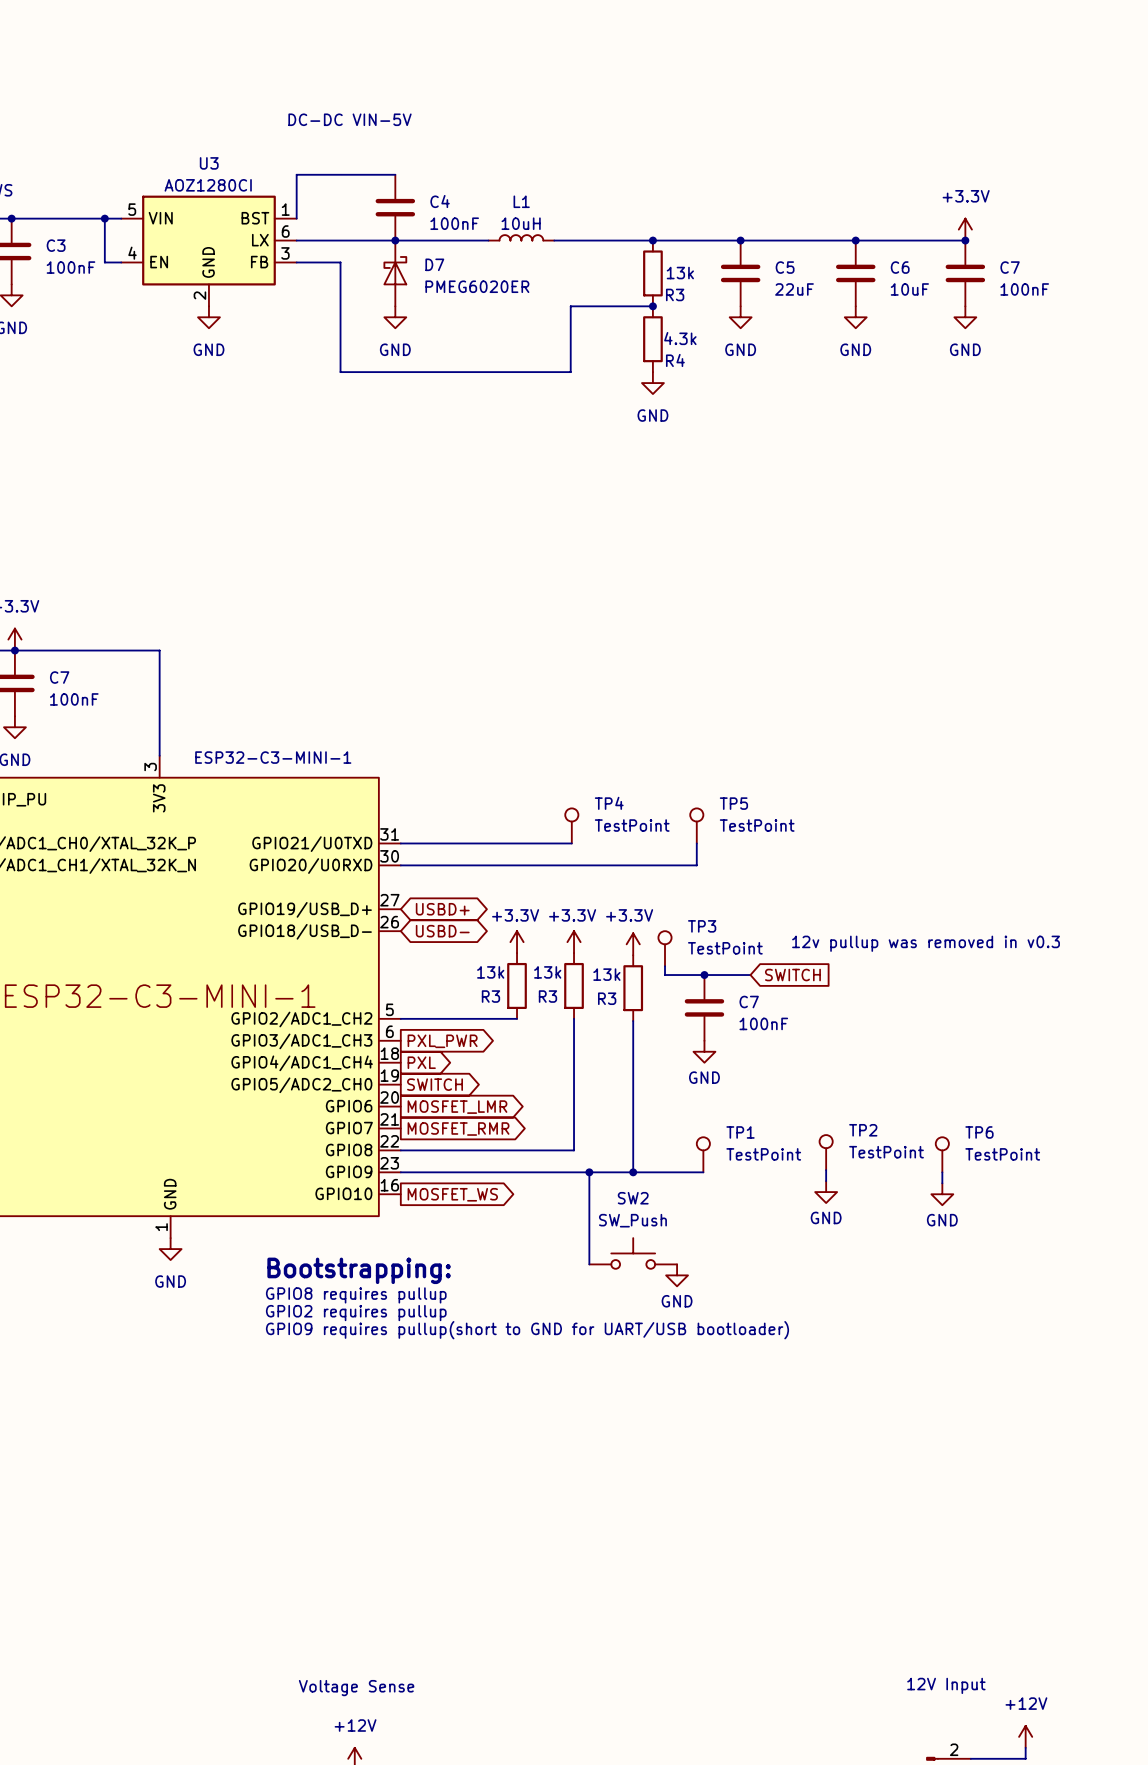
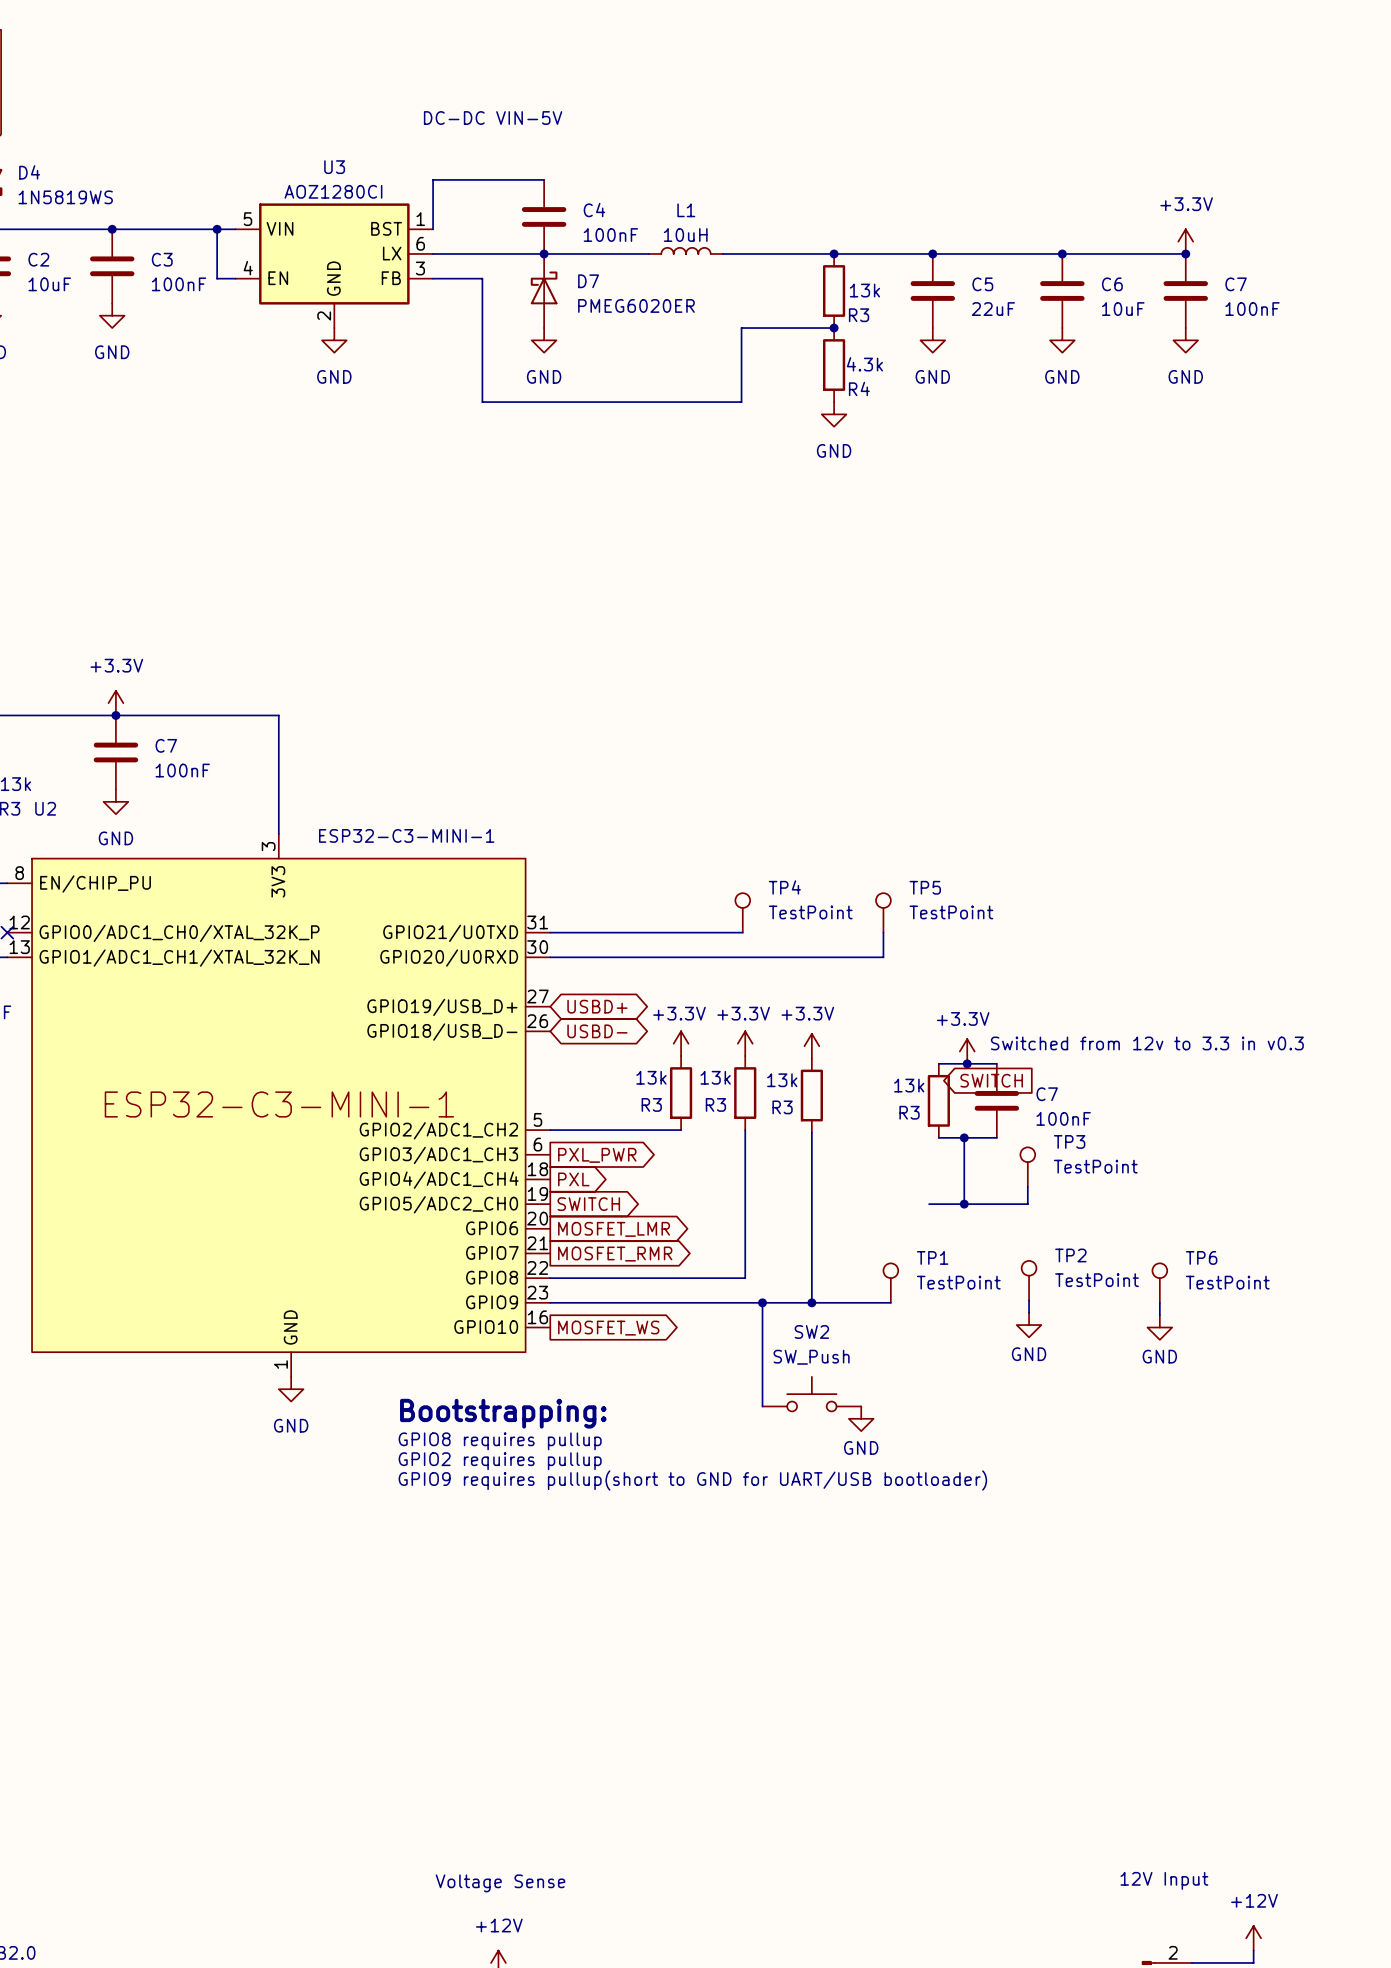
text: 12v pullup was removed in v0.3 (926, 943) -> Switched from 12v to 3.3 in v0.3 (1147, 1043)
TP3 position: (665, 948) -> (1027, 1167)
power symbol: none -> +3.3V (967, 1051)
wire: none -> (938, 1063) (996, 1063)
junction: none -> (967, 1063)
wire: (665, 966) (665, 975) (750, 975) -> none
junction: (704, 975) -> none
R3: none -> 13k (938, 1100)
C7 position: (704, 1007) -> (996, 1100)
wire: none -> (938, 1137) (996, 1137)
wire: none -> (964, 1137) (964, 1204)
junction: none -> (964, 1137)
power symbol: GND (704, 1051) -> none
wire: none -> (1027, 1186) (1027, 1204) (929, 1204)
junction: none -> (964, 1204)

